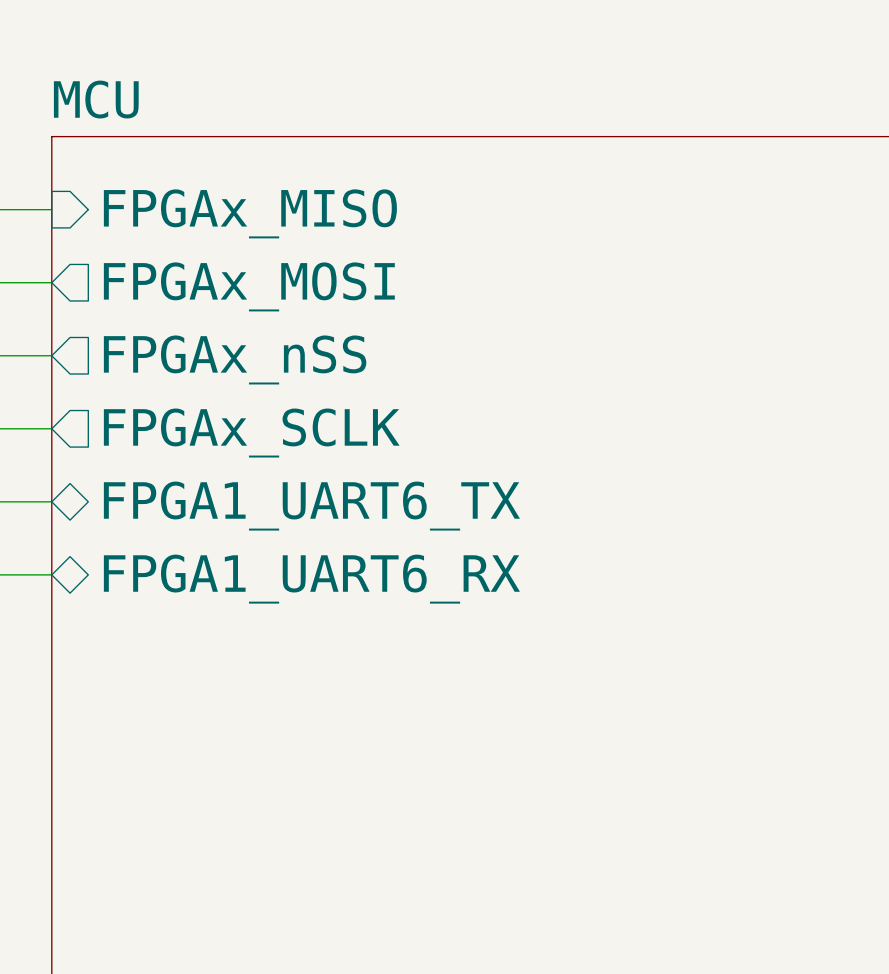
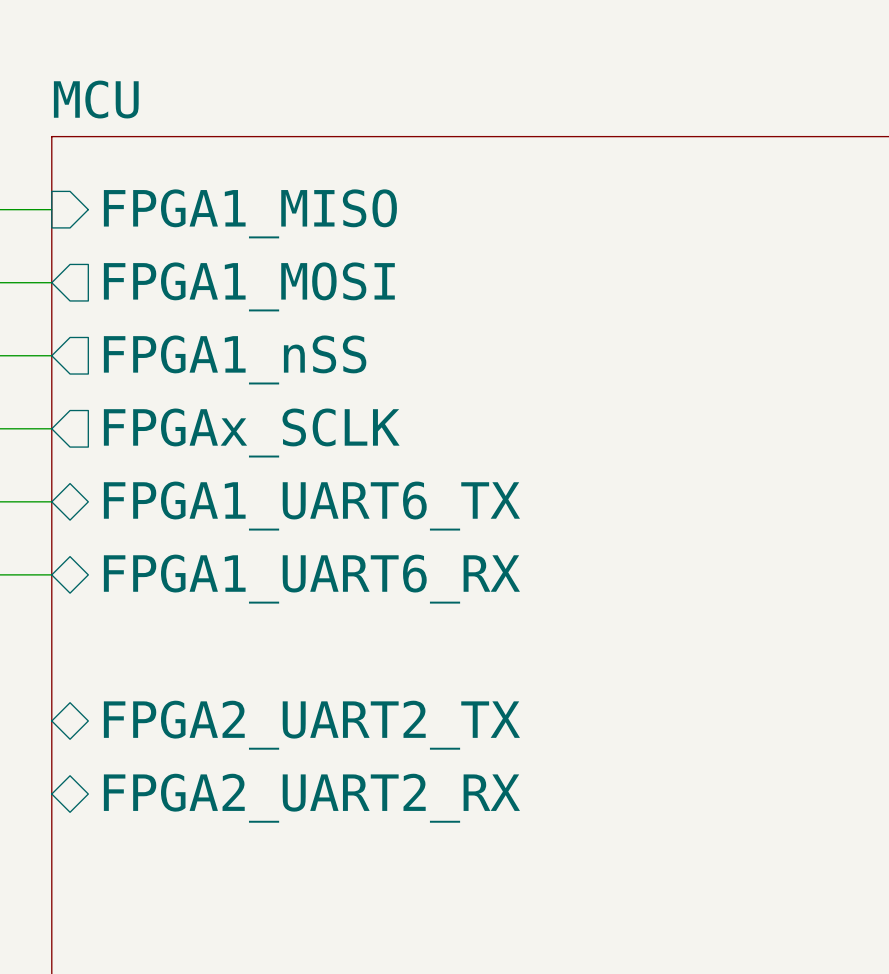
sheet pin: FPGAx_MISO (250, 213) -> FPGA1_MISO (250, 213)
sheet pin: FPGAx_MOSI (249, 286) -> FPGA1_MOSI (249, 286)
sheet pin: FPGAx_nSS (235, 359) -> FPGA1_nSS (235, 359)
sheet pin: none -> FPGA2_UART2_TX (311, 725)
sheet pin: none -> FPGA2_UART2_RX (311, 798)

